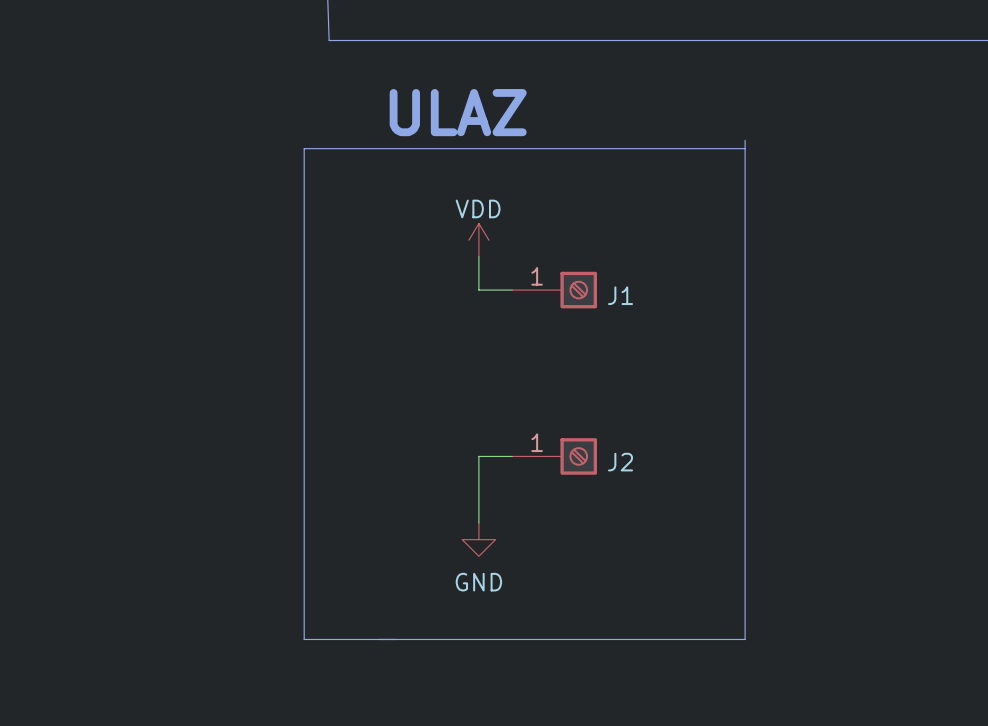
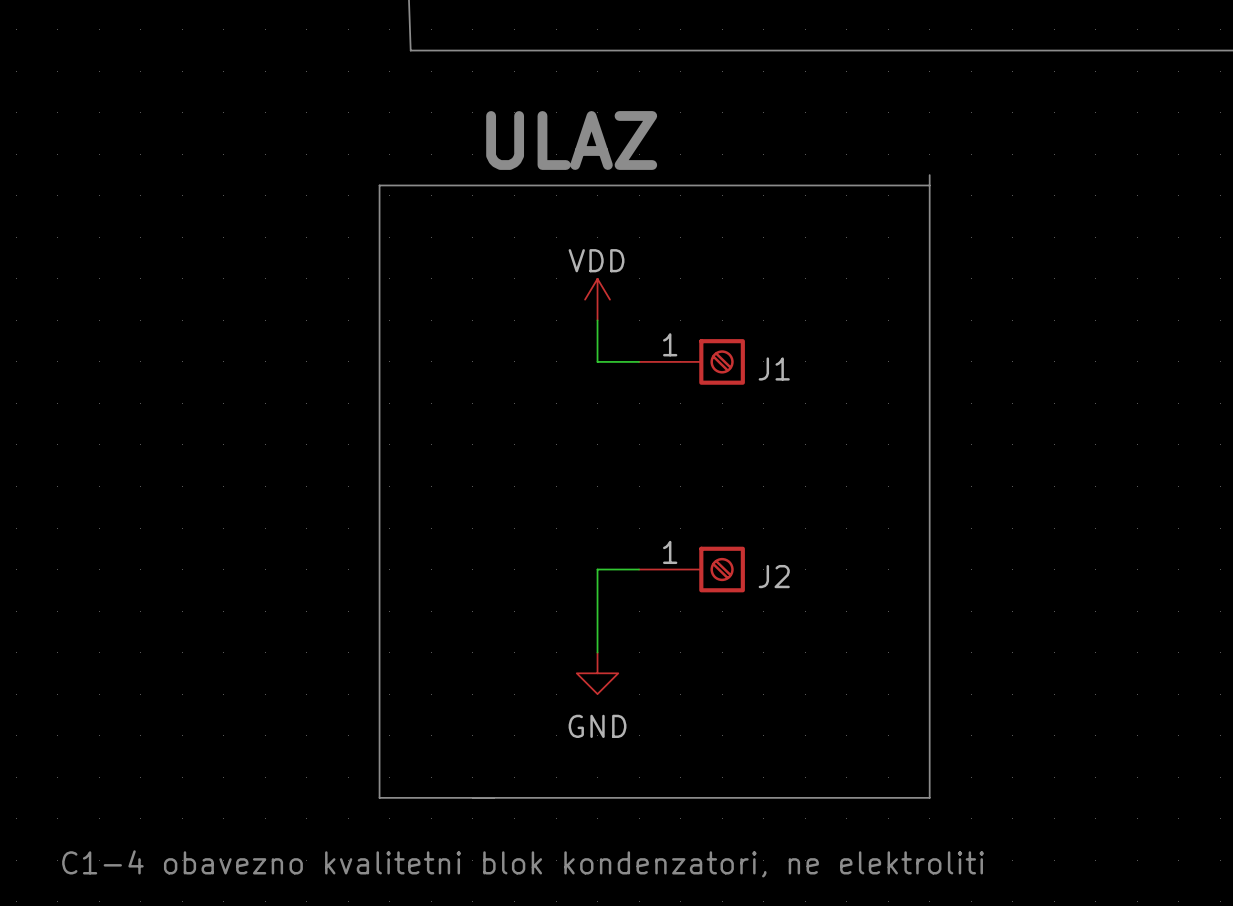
text: none -> C1-4 obavezno kvalitetni blok kondenzatori, ne elektroliti (523, 863)

